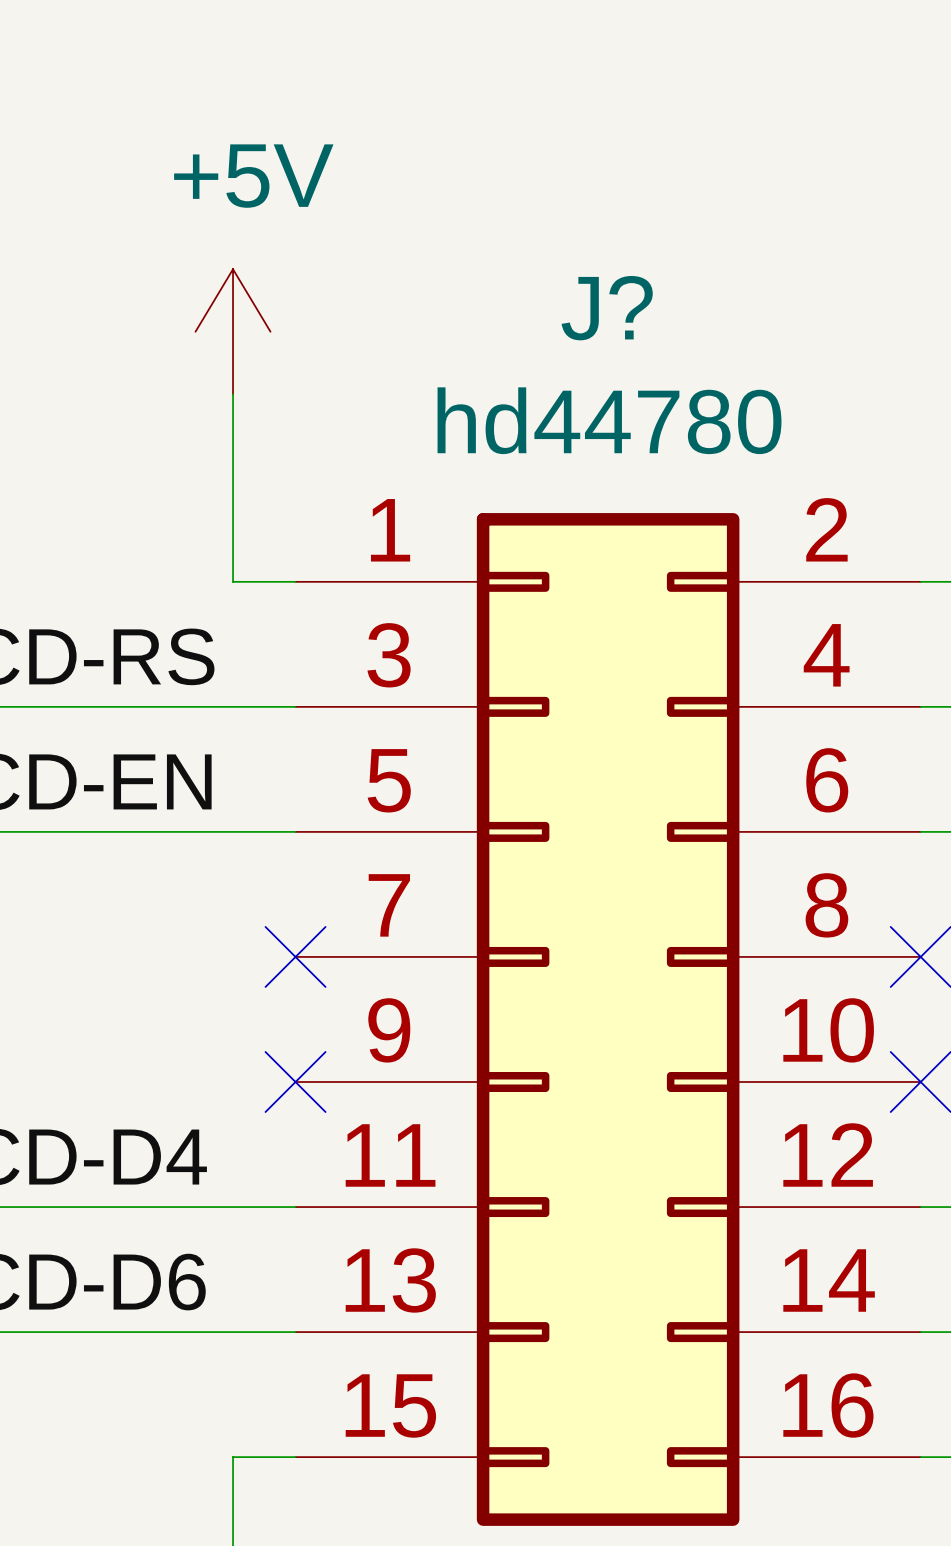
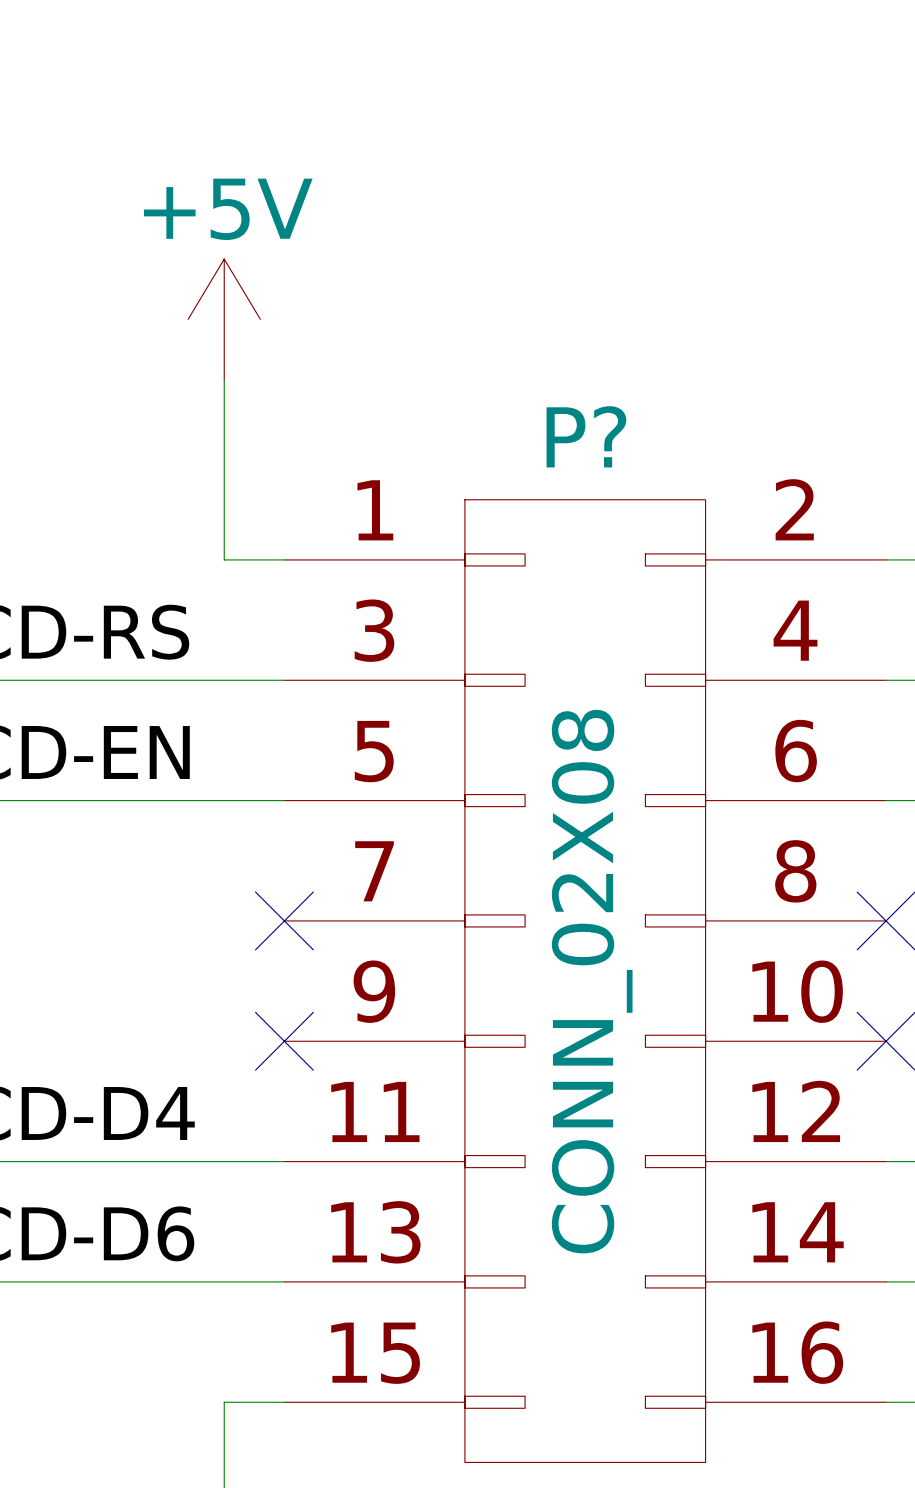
power symbol text position: +5V (253, 176) -> +5V (228, 209)
J?: hd44780 (608, 1019) -> none
P?: none -> CONN_02X08 (585, 981)

